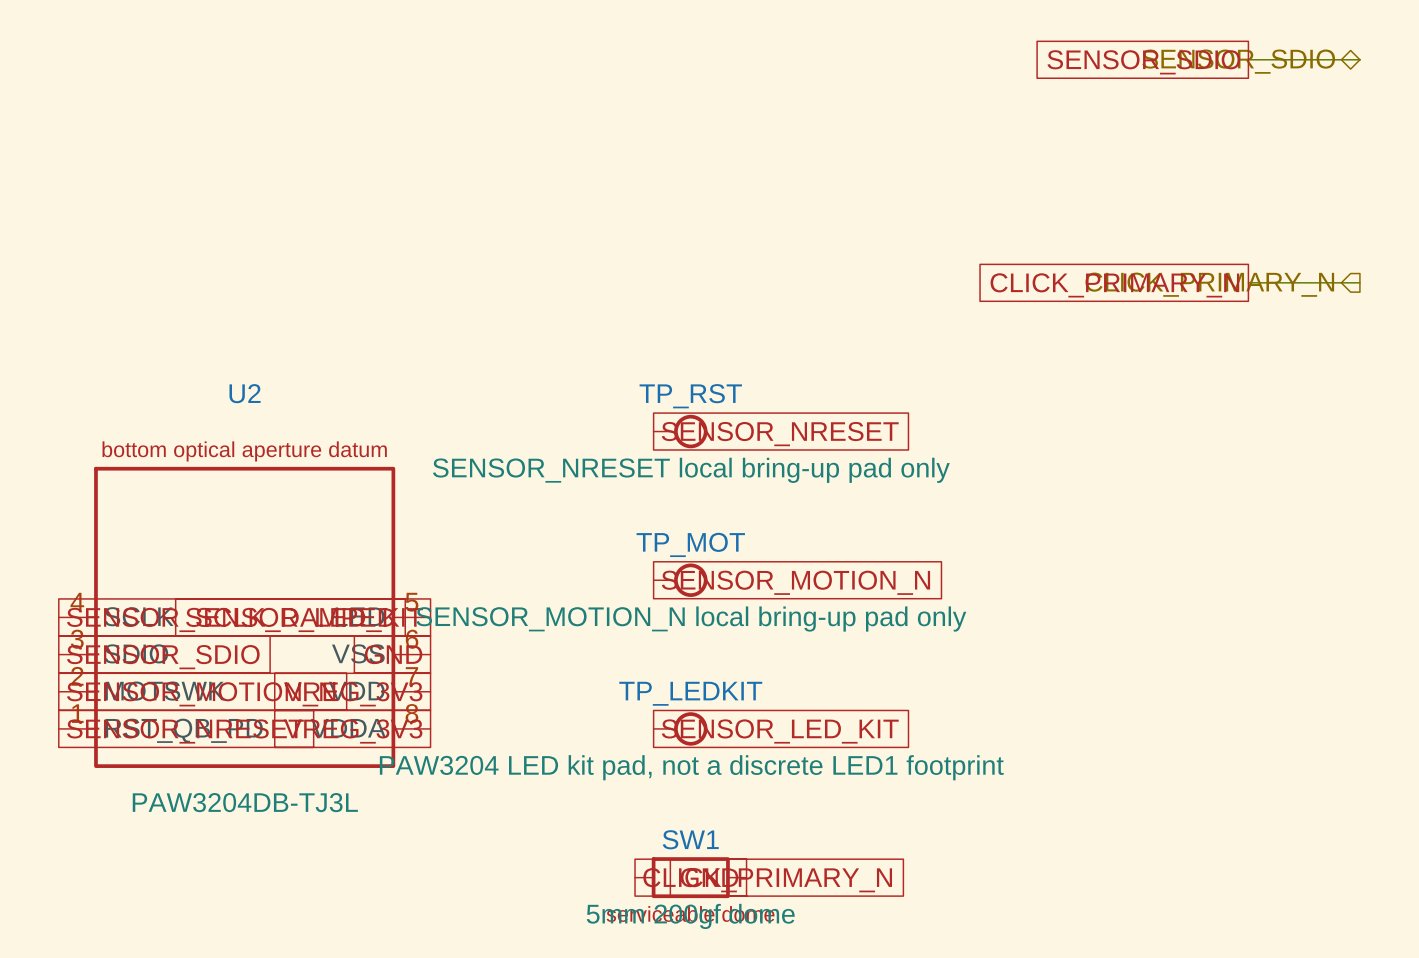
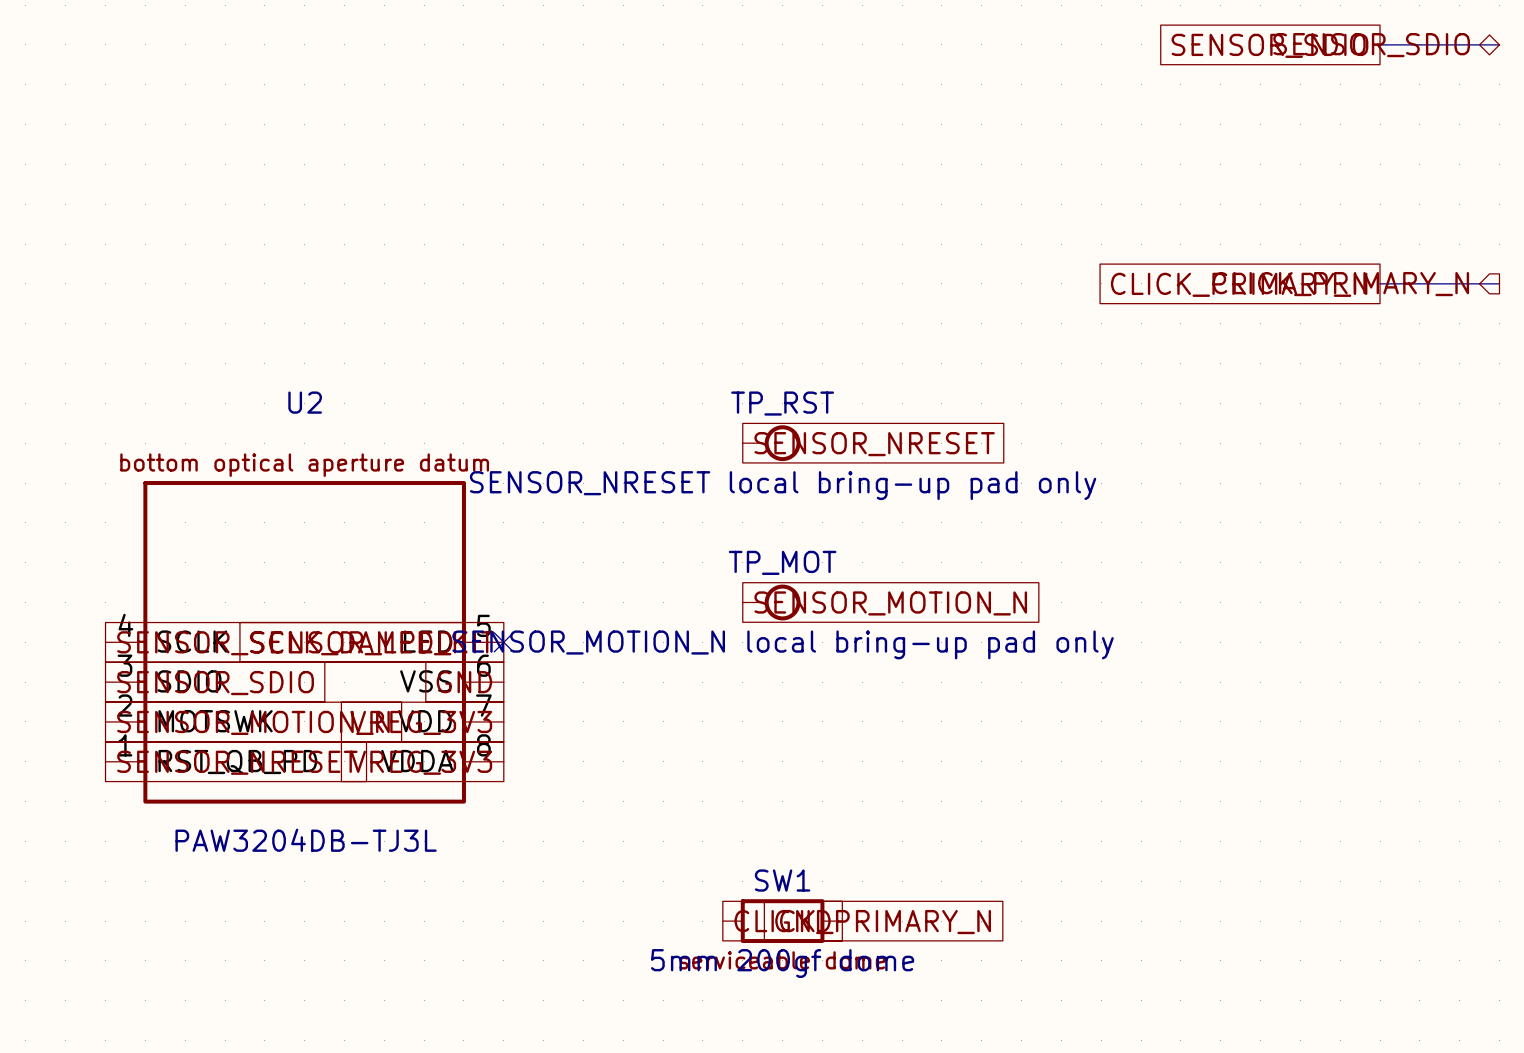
no-connect mark: none -> (503, 642)
TP_LEDKIT: PAW3204 LED kit pad, not a discrete LED1 footprint (680, 728) -> none
global label: SENSOR_LED_KIT (780, 731) -> none

